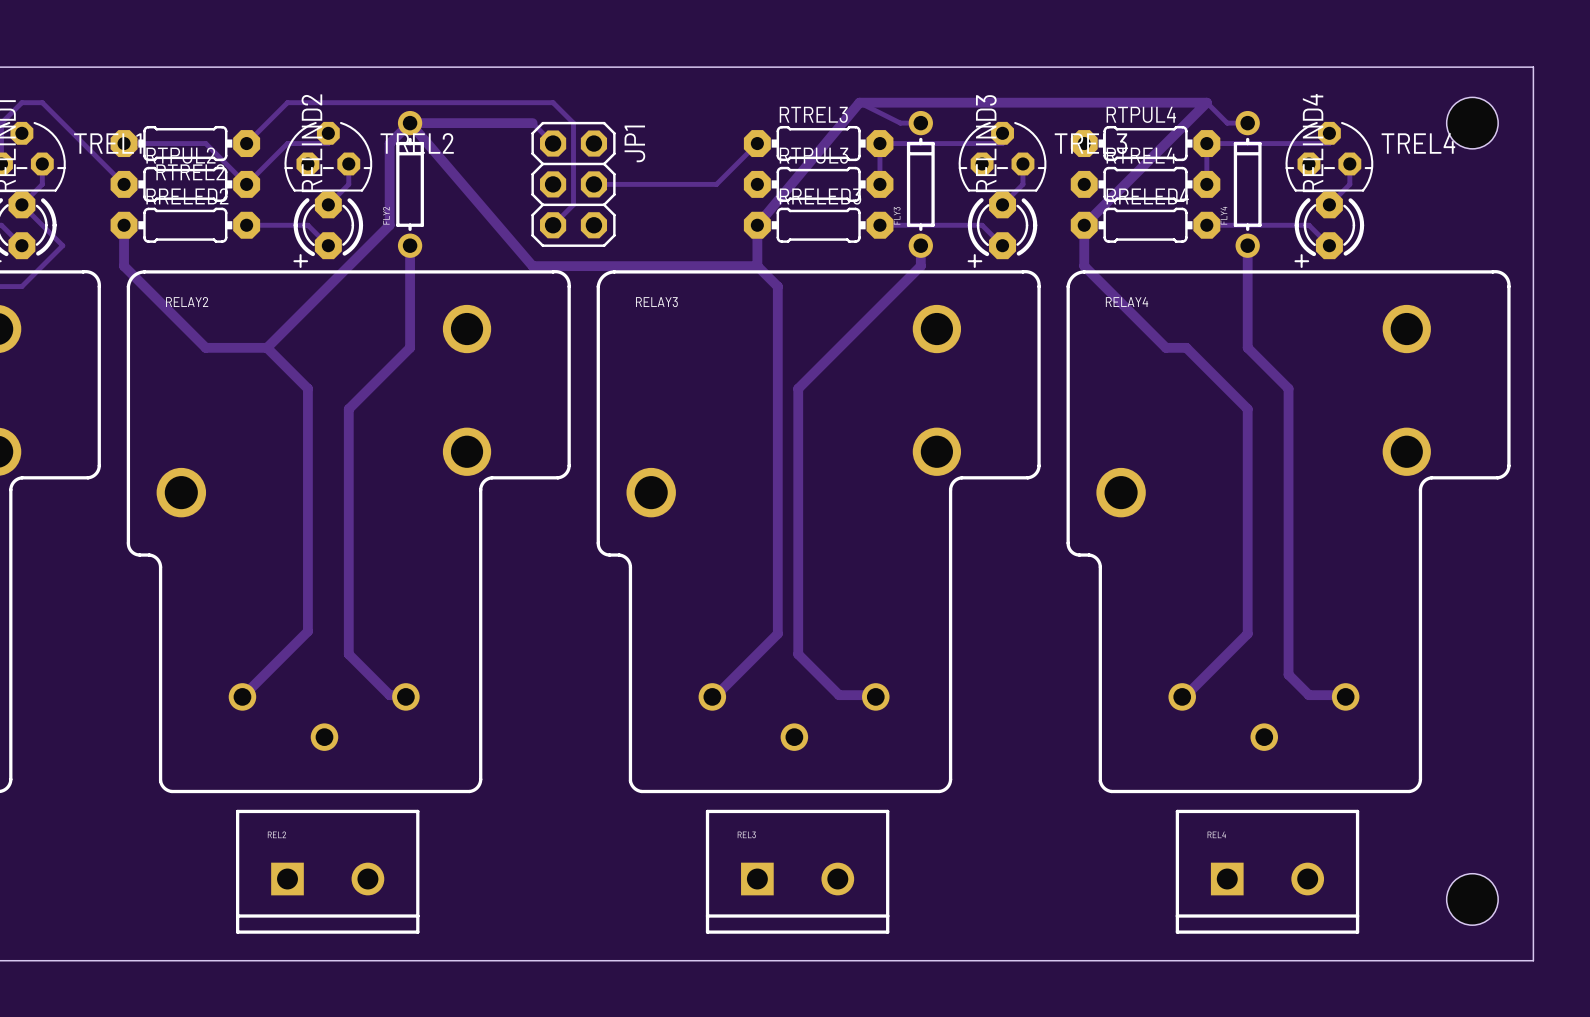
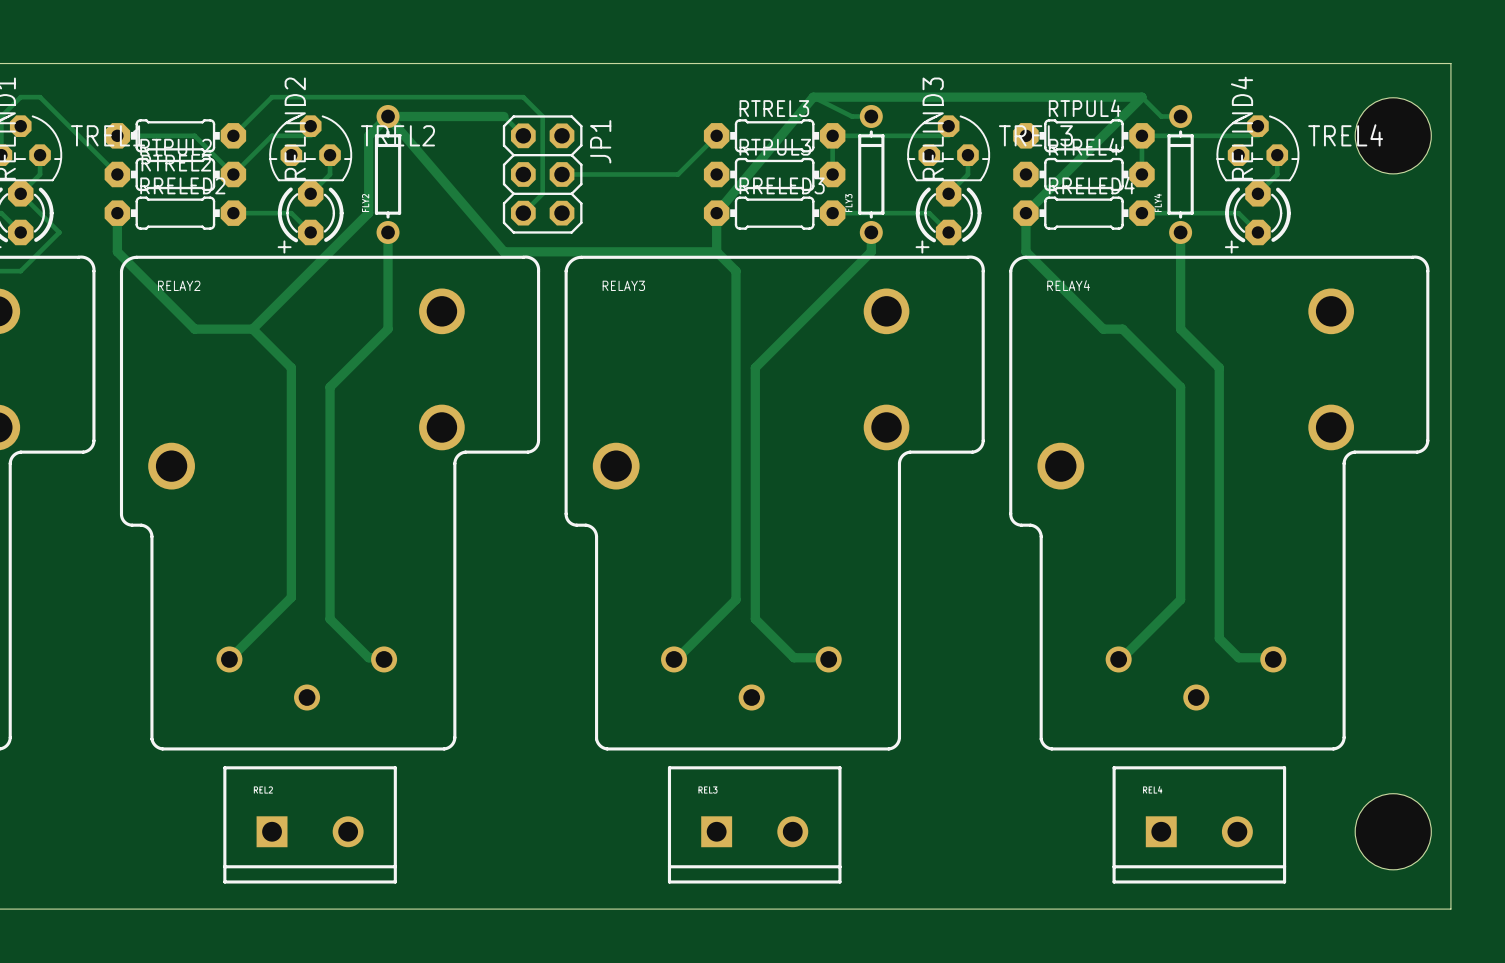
hole: (1472, 123) -> none
hole: none -> (1393, 135)
hole: none -> (1393, 831)
hole: (1472, 899) -> none

